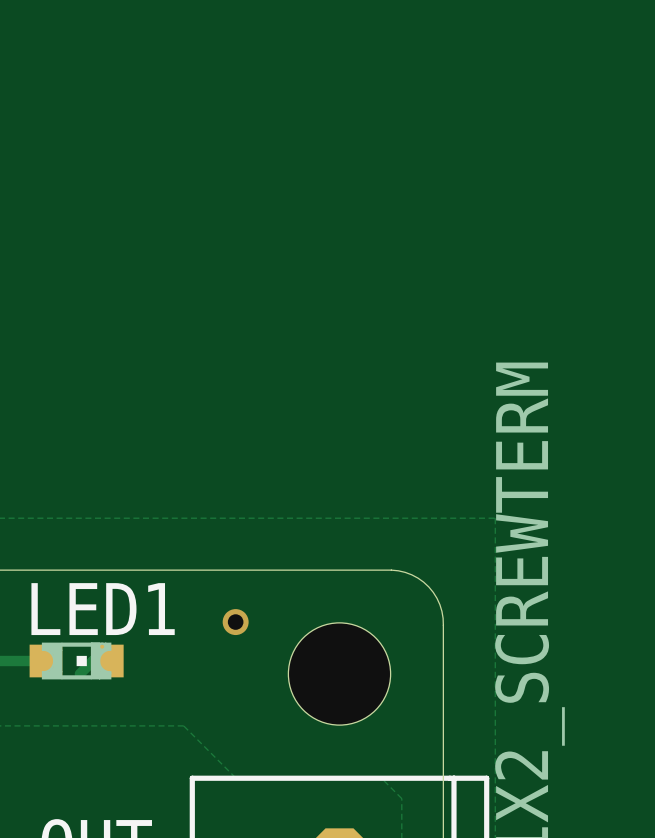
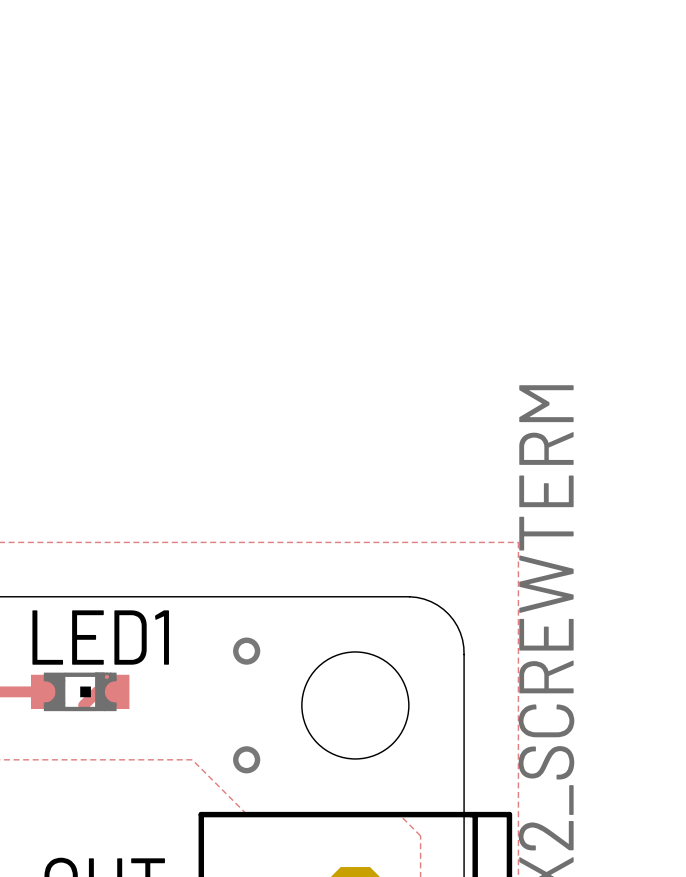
via: none -> (246, 759)

